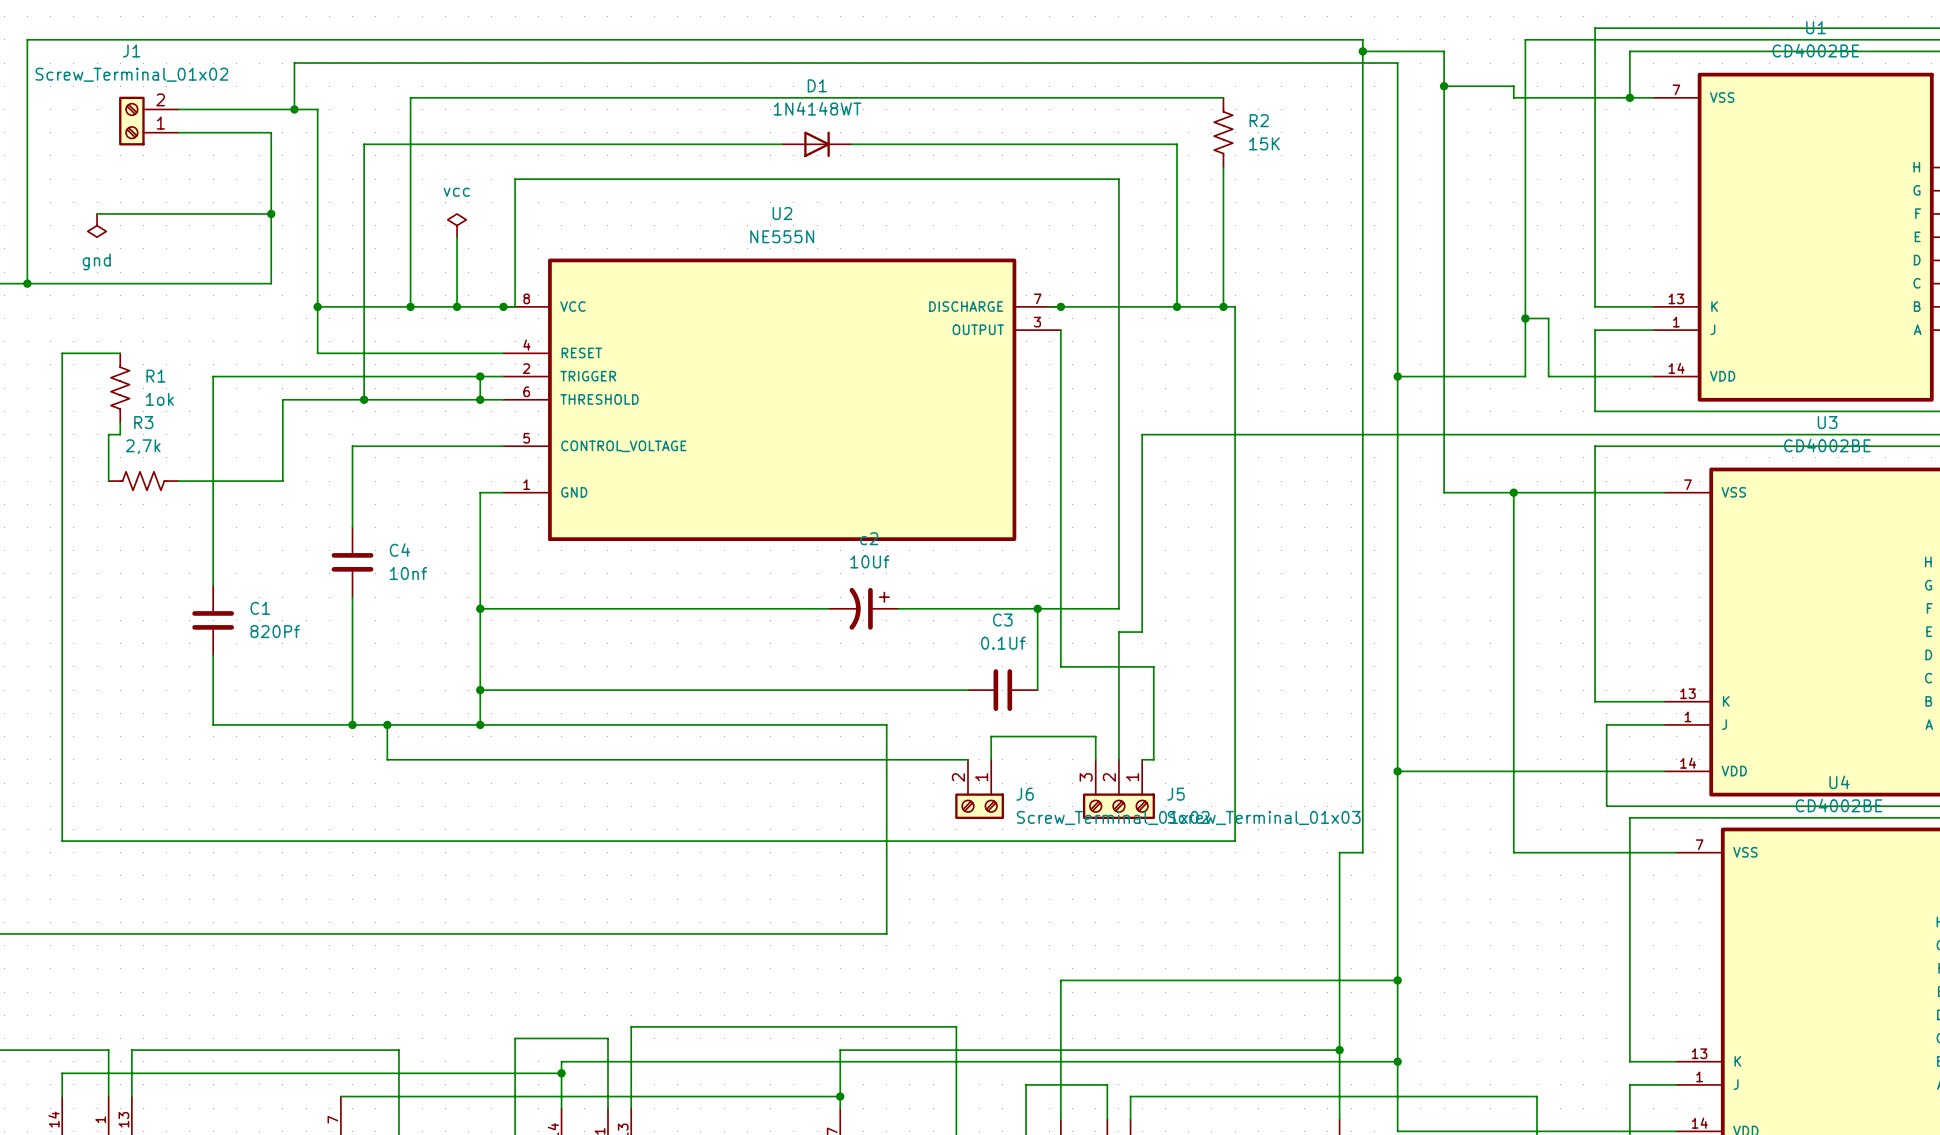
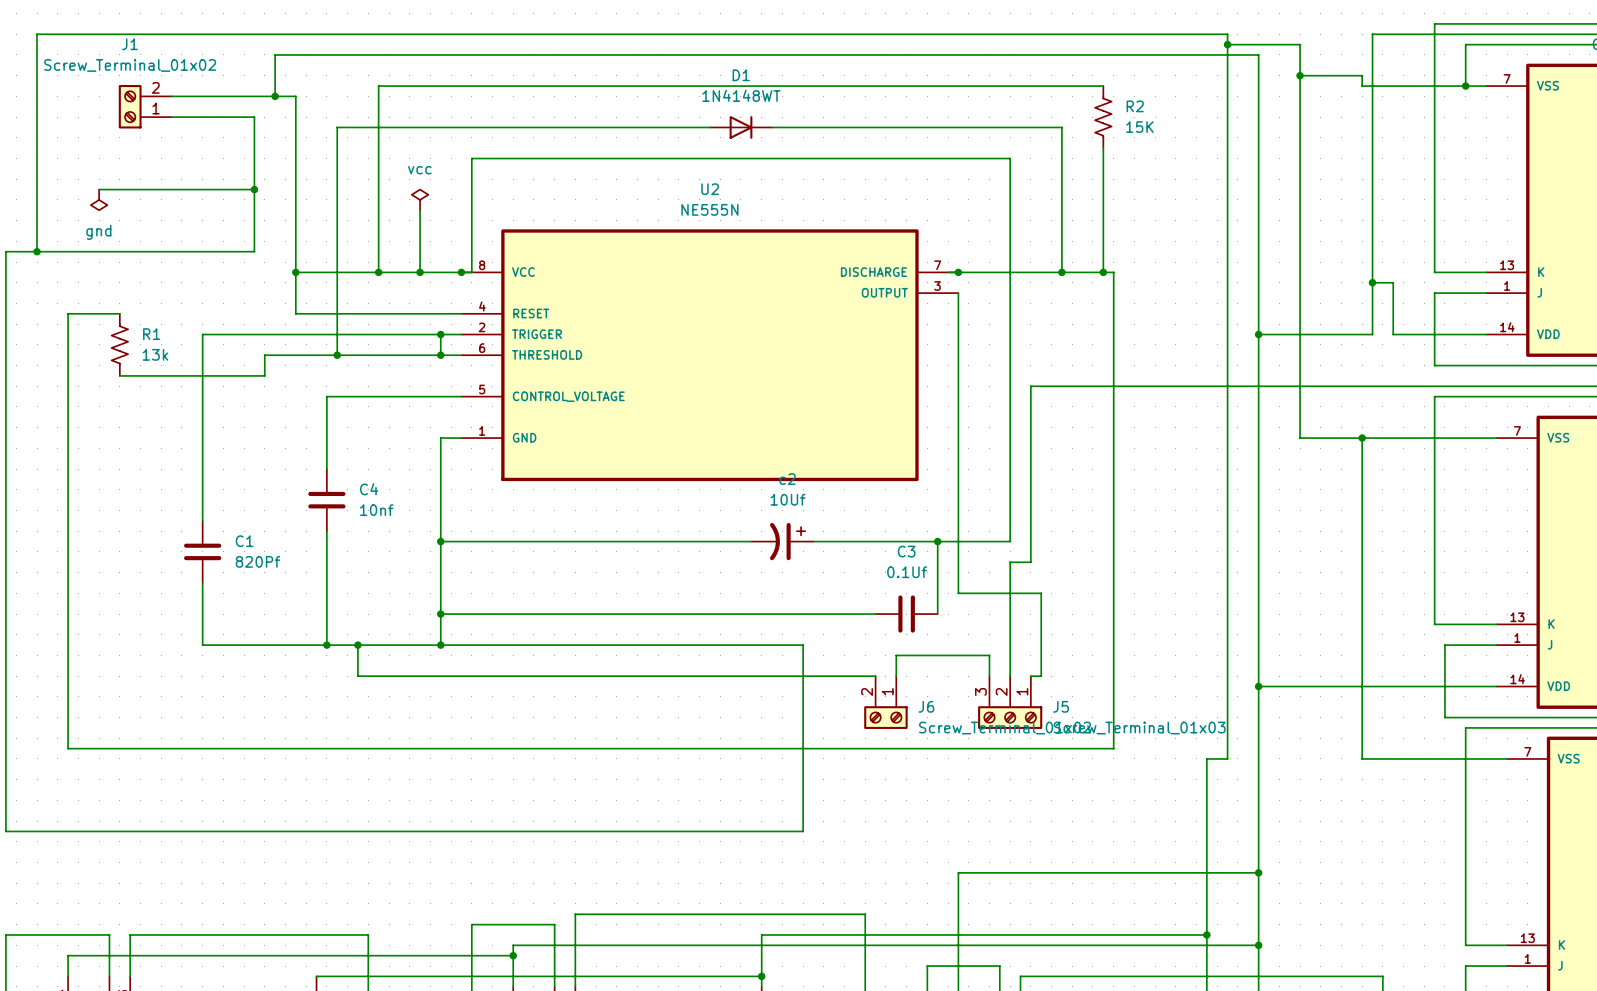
R1 value: 1ok (159, 399) -> 13k (155, 354)
wire: (120, 423) (120, 434) (108, 434) (108, 481) -> none
wire: (282, 423) (282, 481) (178, 481) -> (264, 375) (119, 375)
R3: 2,7k (143, 481) -> none

